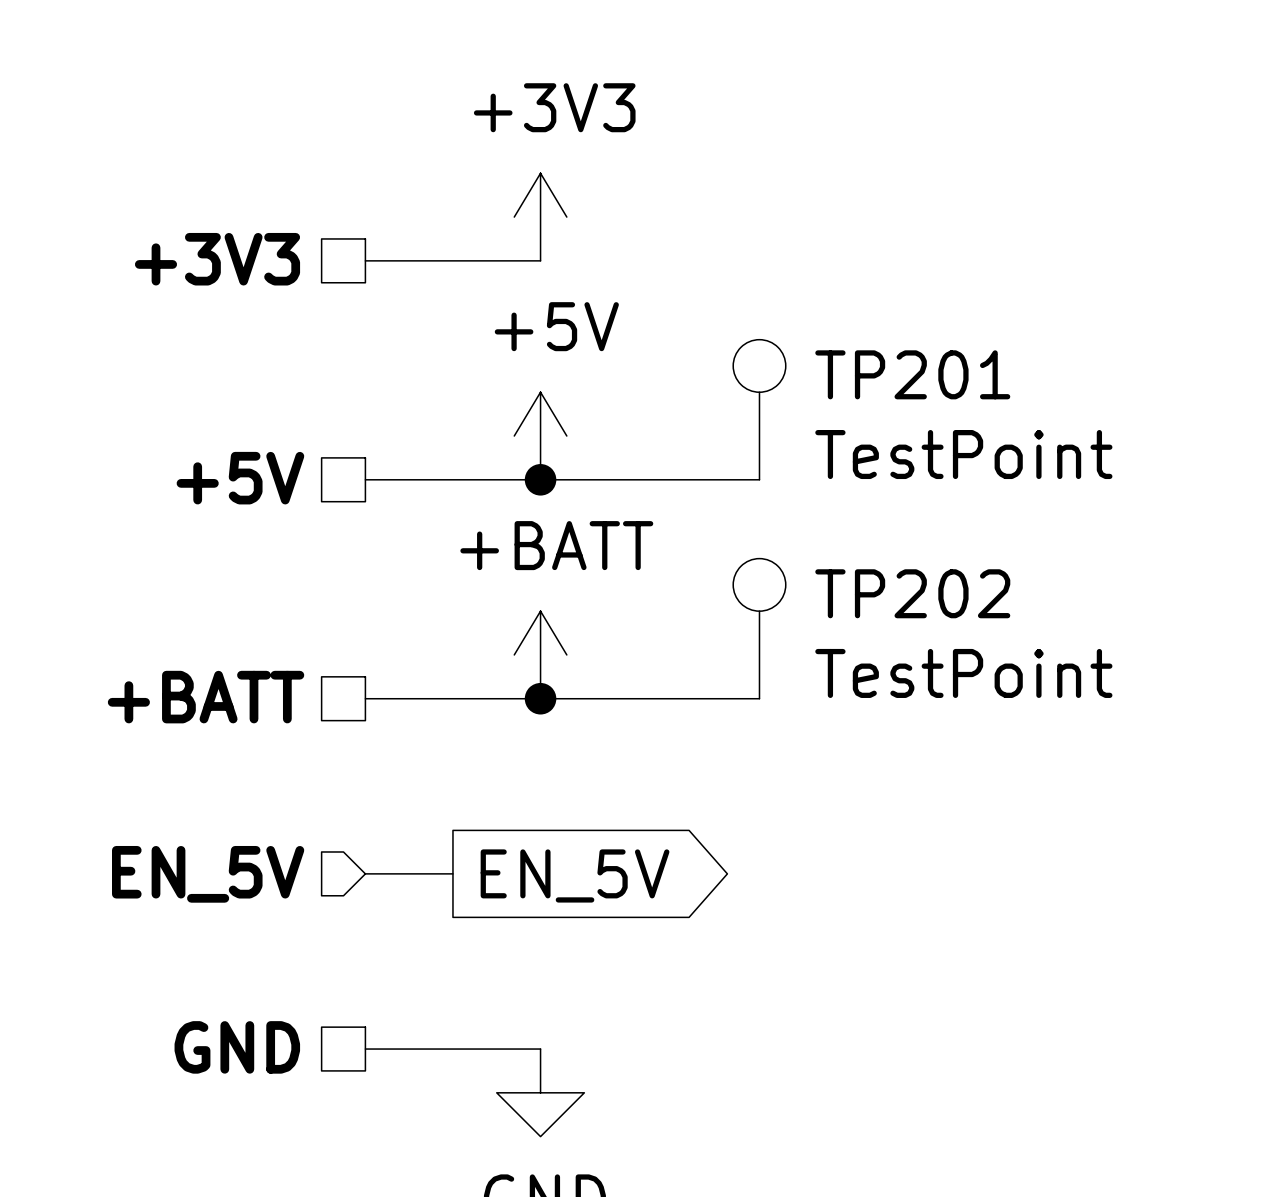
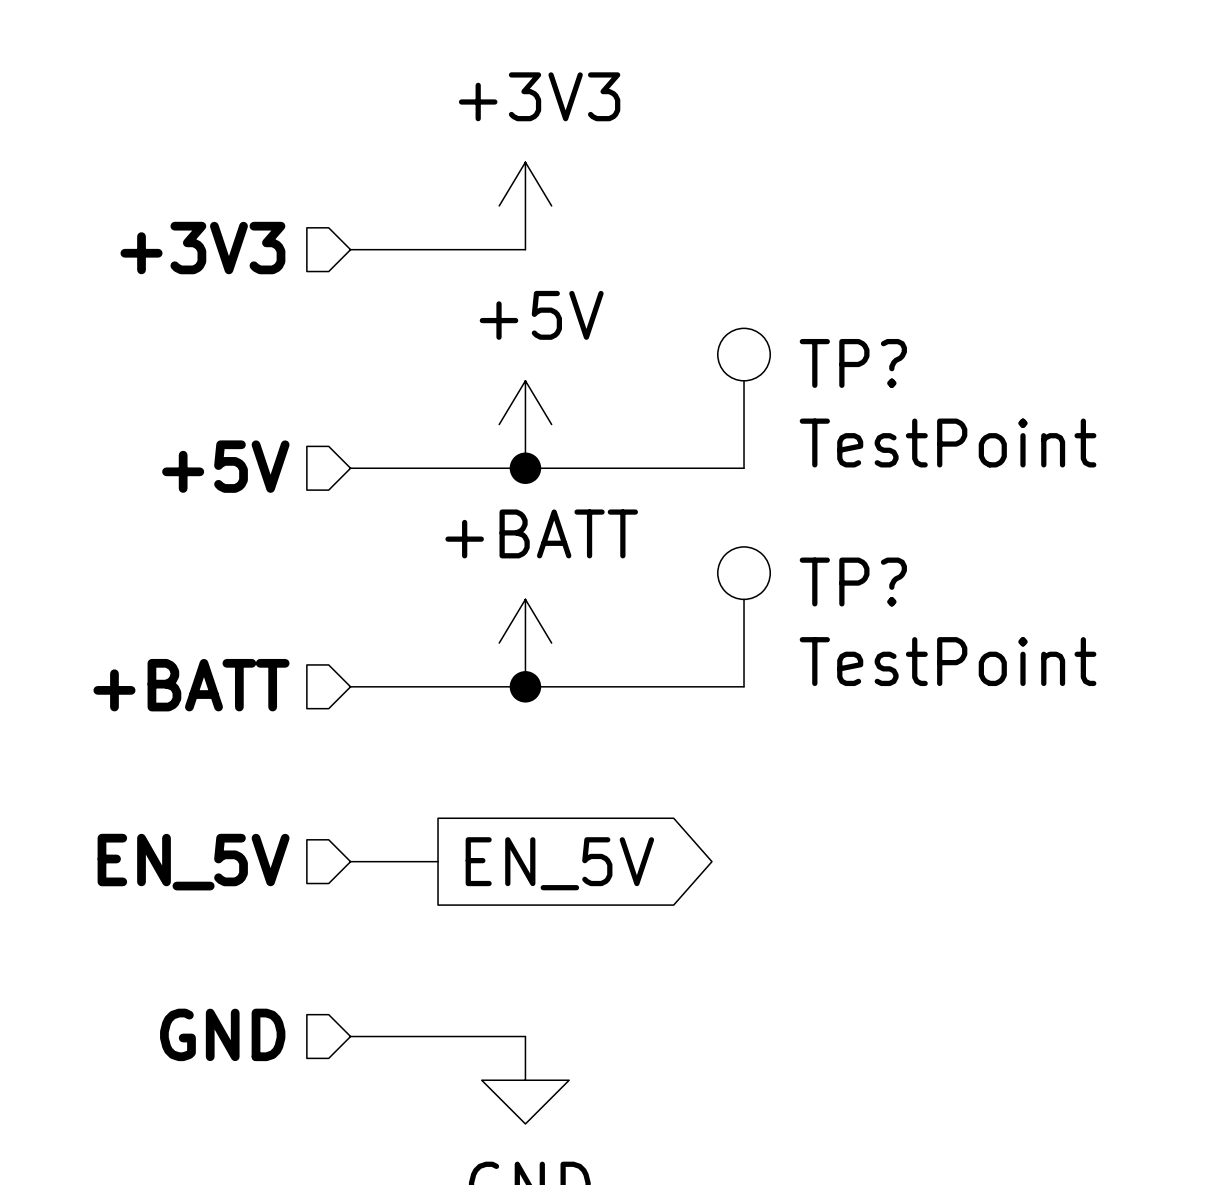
hierarchical label shape: passive (217, 259) -> input (202, 248)
TP201 name: TP201 (912, 374) -> TP? (853, 363)
hierarchical label shape: passive (240, 478) -> input (225, 466)
TP202 name: TP202 (912, 593) -> TP? (853, 582)
hierarchical label shape: passive (206, 697) -> input (191, 685)
hierarchical label shape: passive (237, 1047) -> input (222, 1034)

